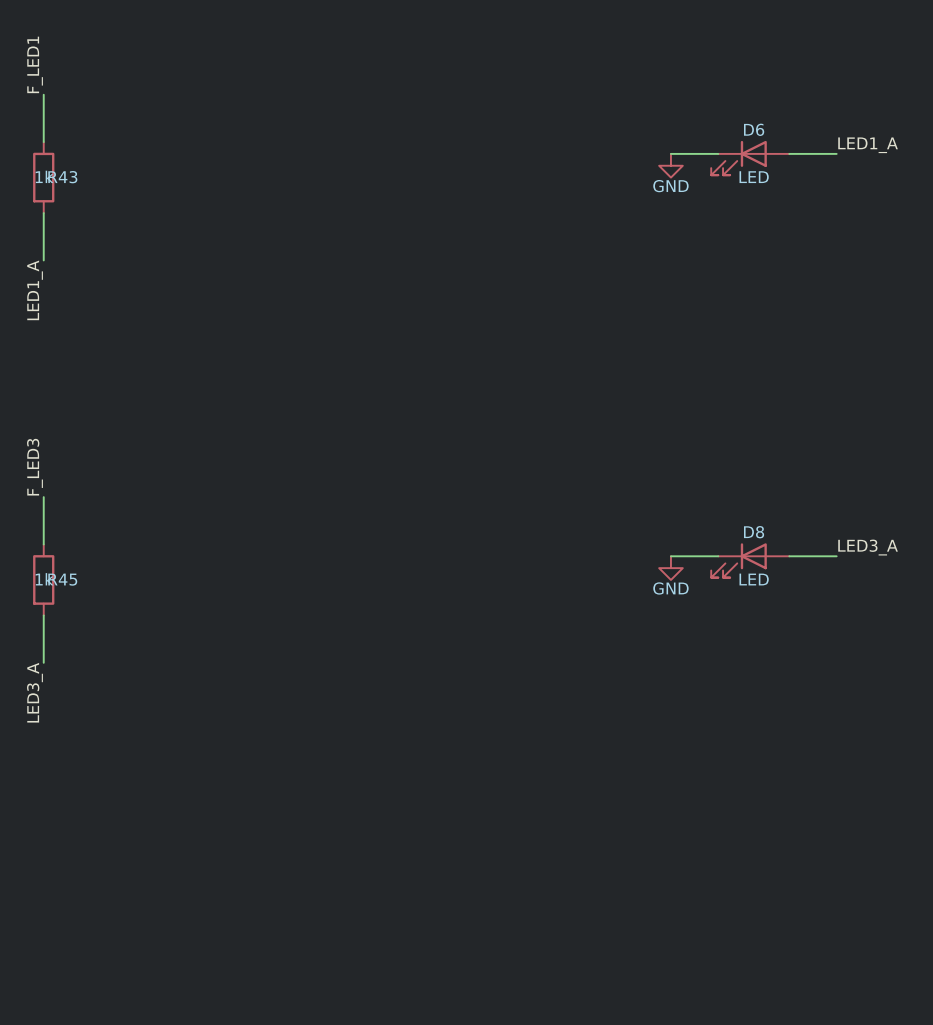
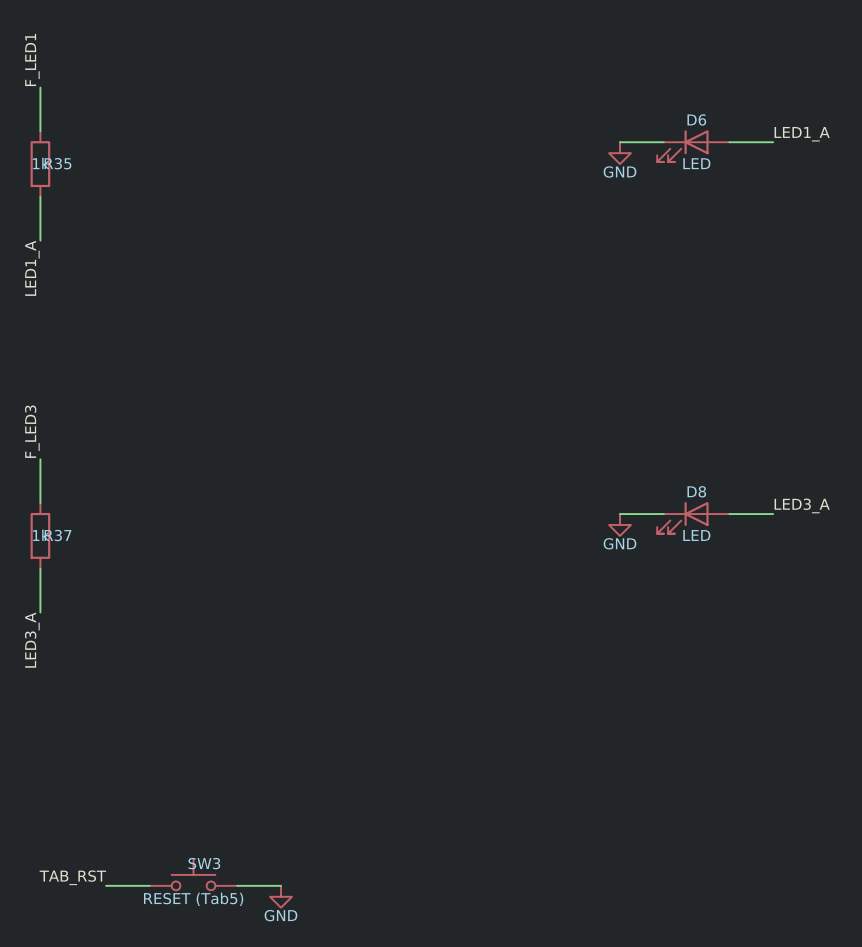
R43 name: R43 (62, 177) -> R35 (57, 163)
R45 name: R45 (62, 579) -> R37 (58, 535)
SW3: none -> RESET (Tab5) (193, 874)
label: none -> TAB_RST (72, 877)
wire: none -> (106, 885) (149, 885)
wire: none -> (237, 885) (281, 885)
power symbol: none -> GND (281, 896)

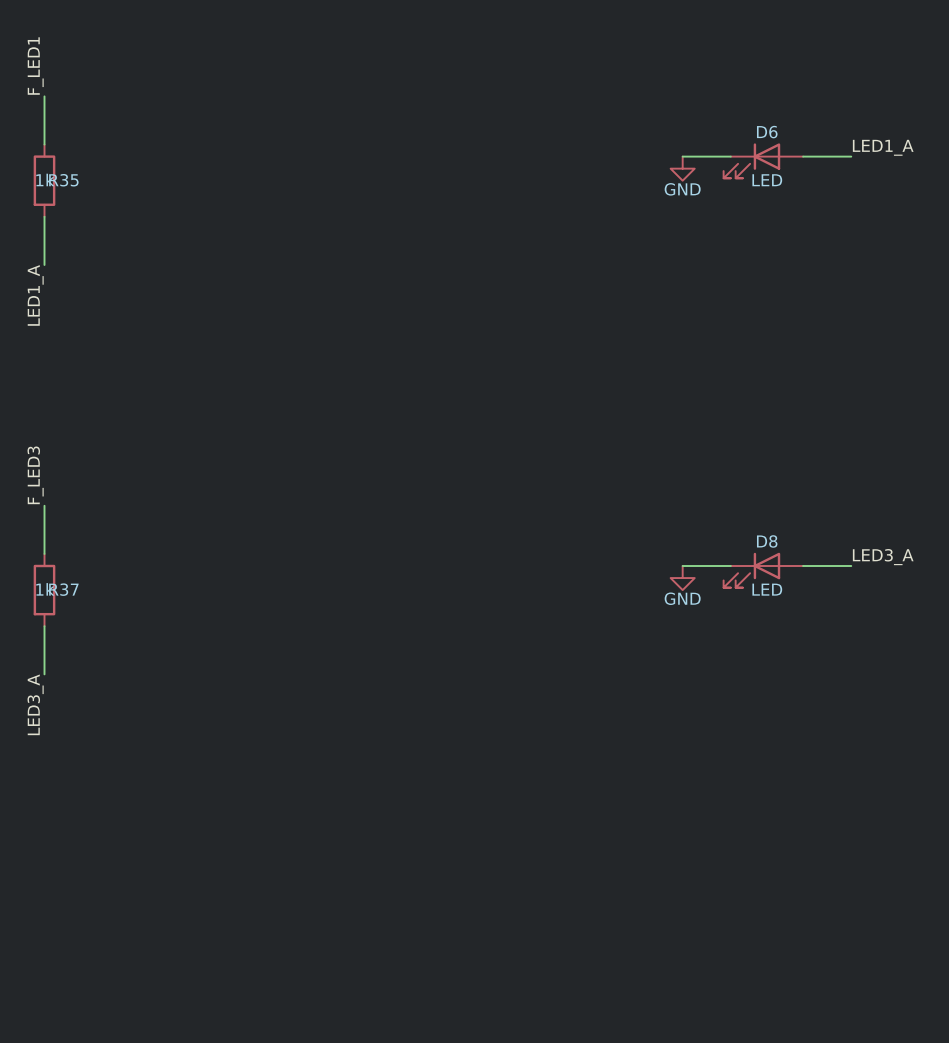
SW3: RESET (Tab5) (193, 874) -> none
label: TAB_RST (72, 877) -> none
wire: (106, 885) (149, 885) -> none
wire: (237, 885) (281, 885) -> none
power symbol: GND (281, 896) -> none

